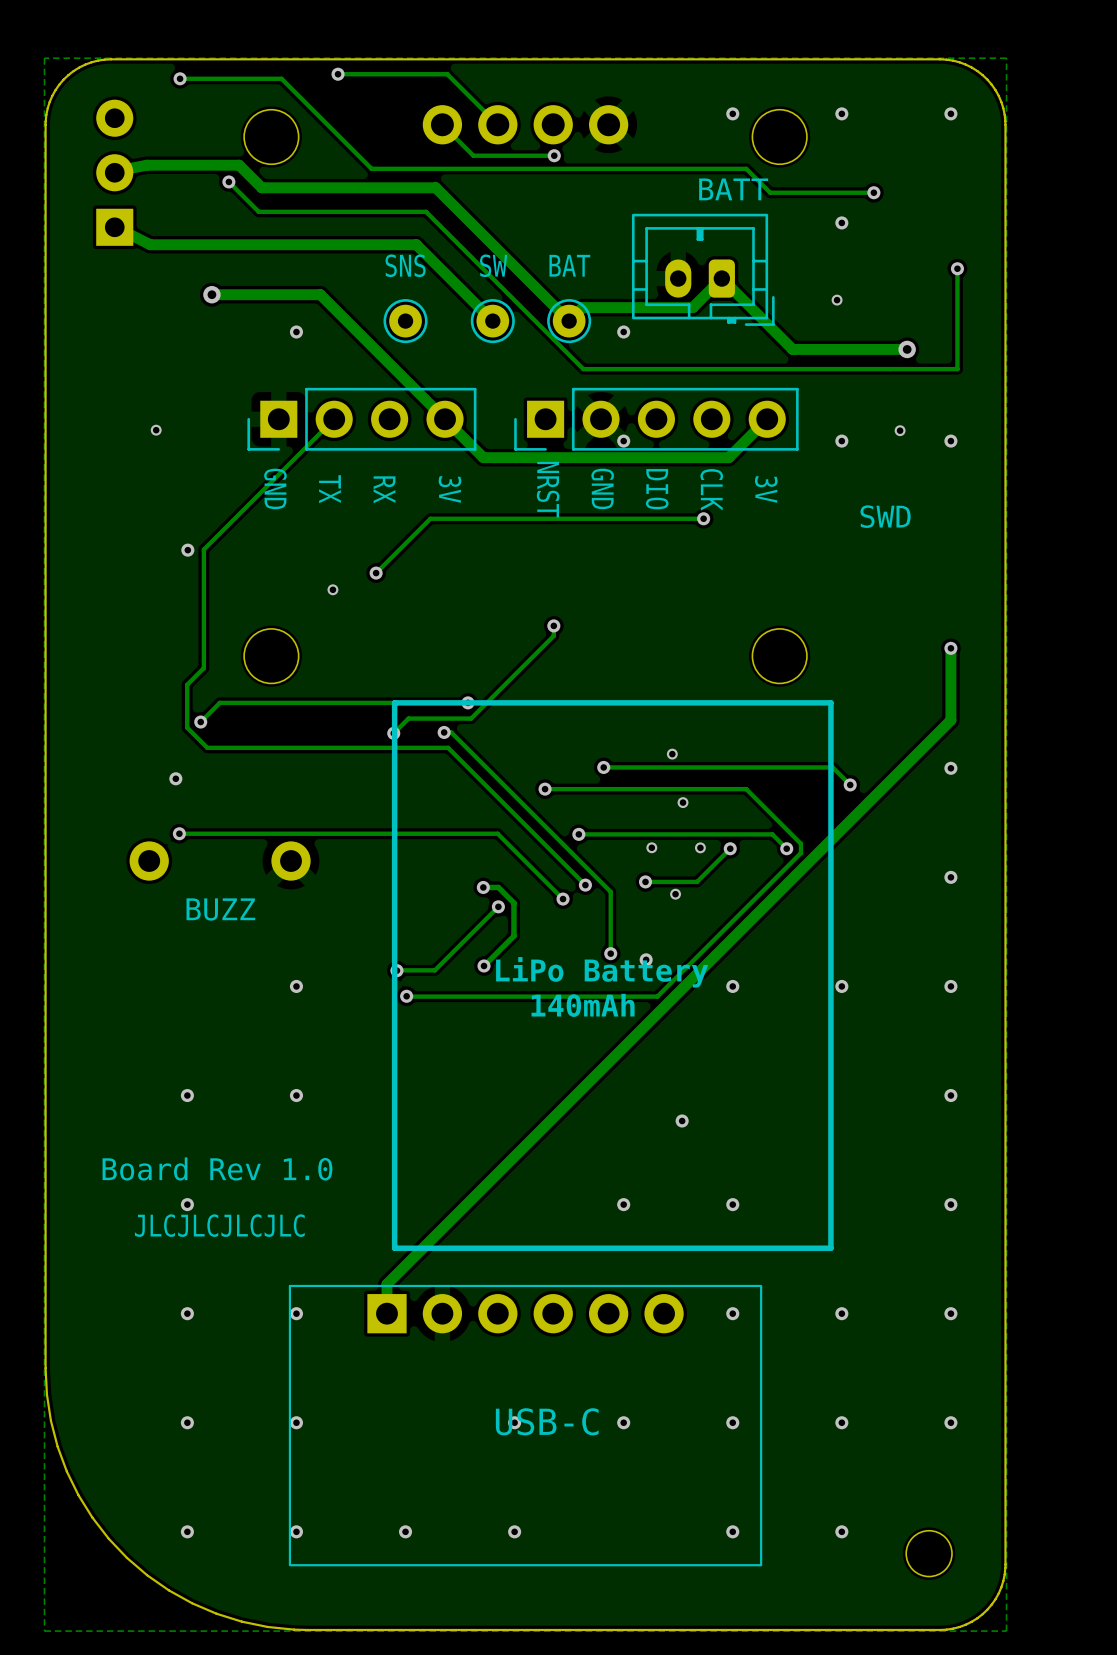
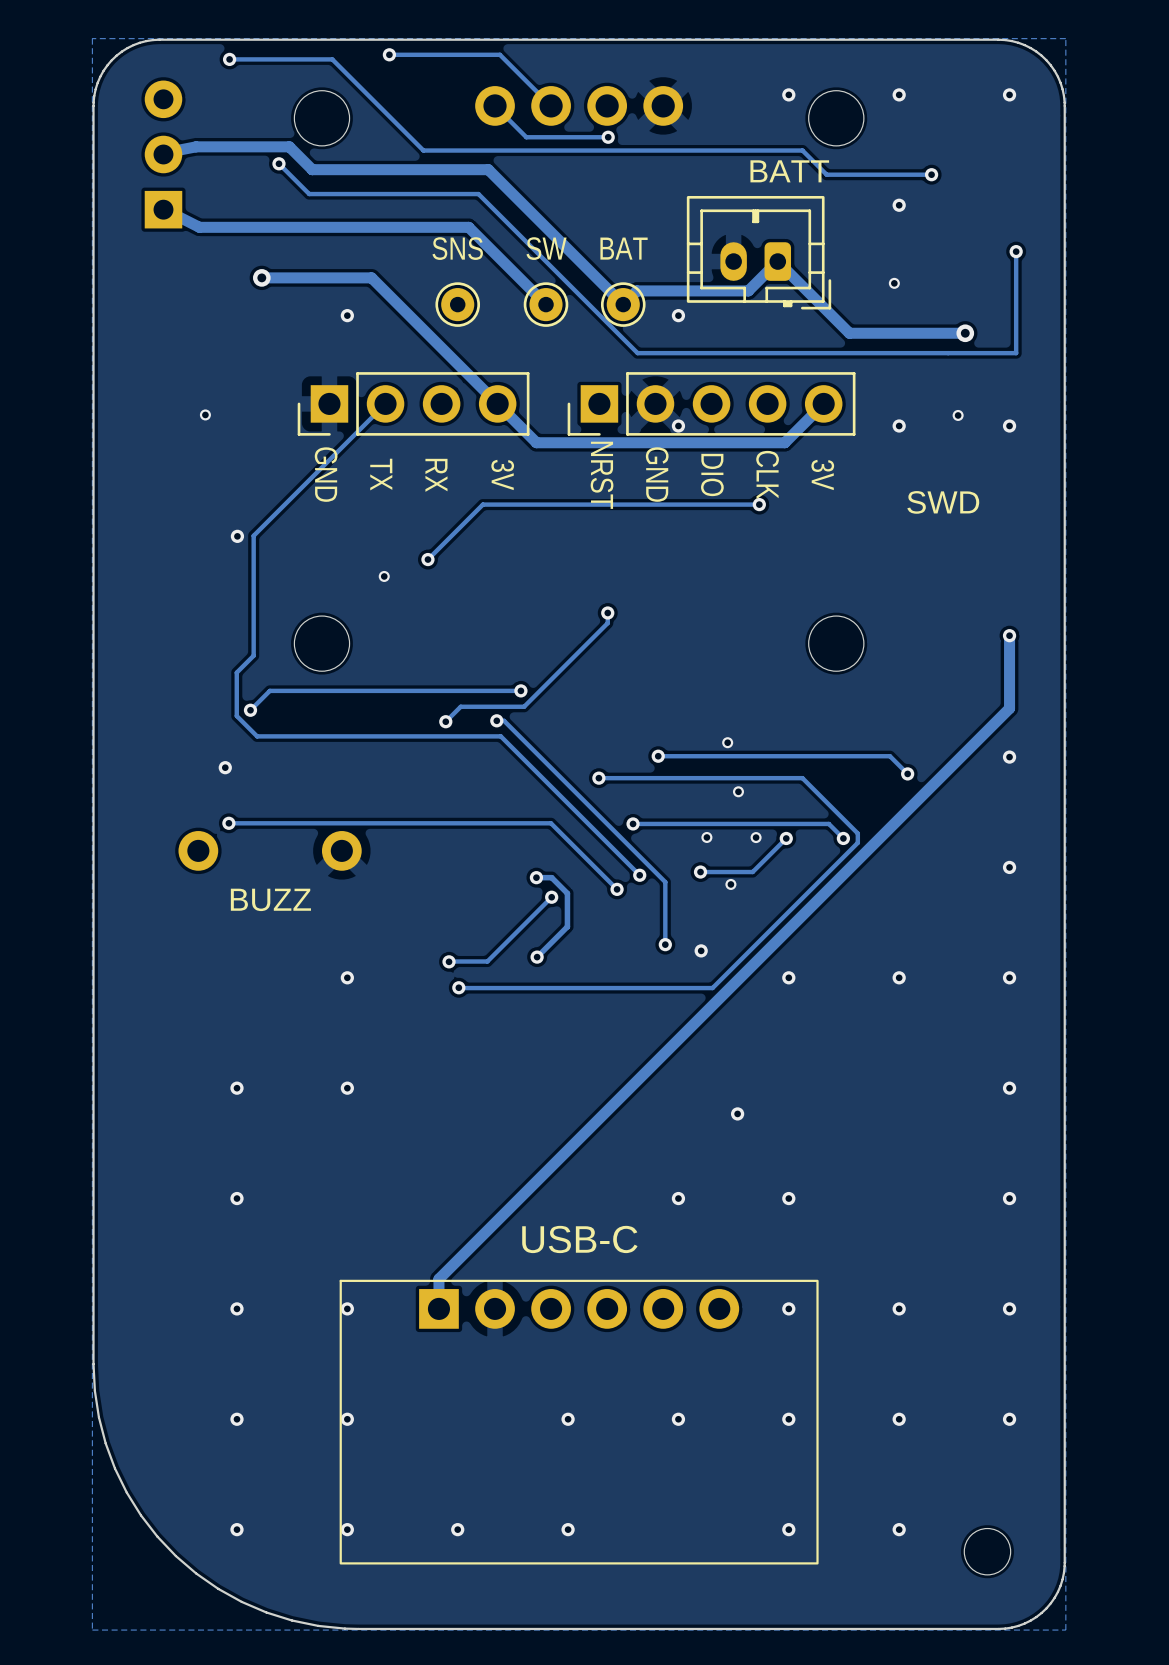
line: (830, 702) (394, 702) (394, 1248) (830, 1248) (830, 702) -> none
text: LiPo Battery (602, 972) -> none
text: 140mAh (583, 1005) -> none
text: Board Rev 1.0 (217, 1168) -> none
text: JLCJLCJLCJLC (219, 1225) -> none
text position: USB-C (547, 1421) -> USB-C (579, 1239)

